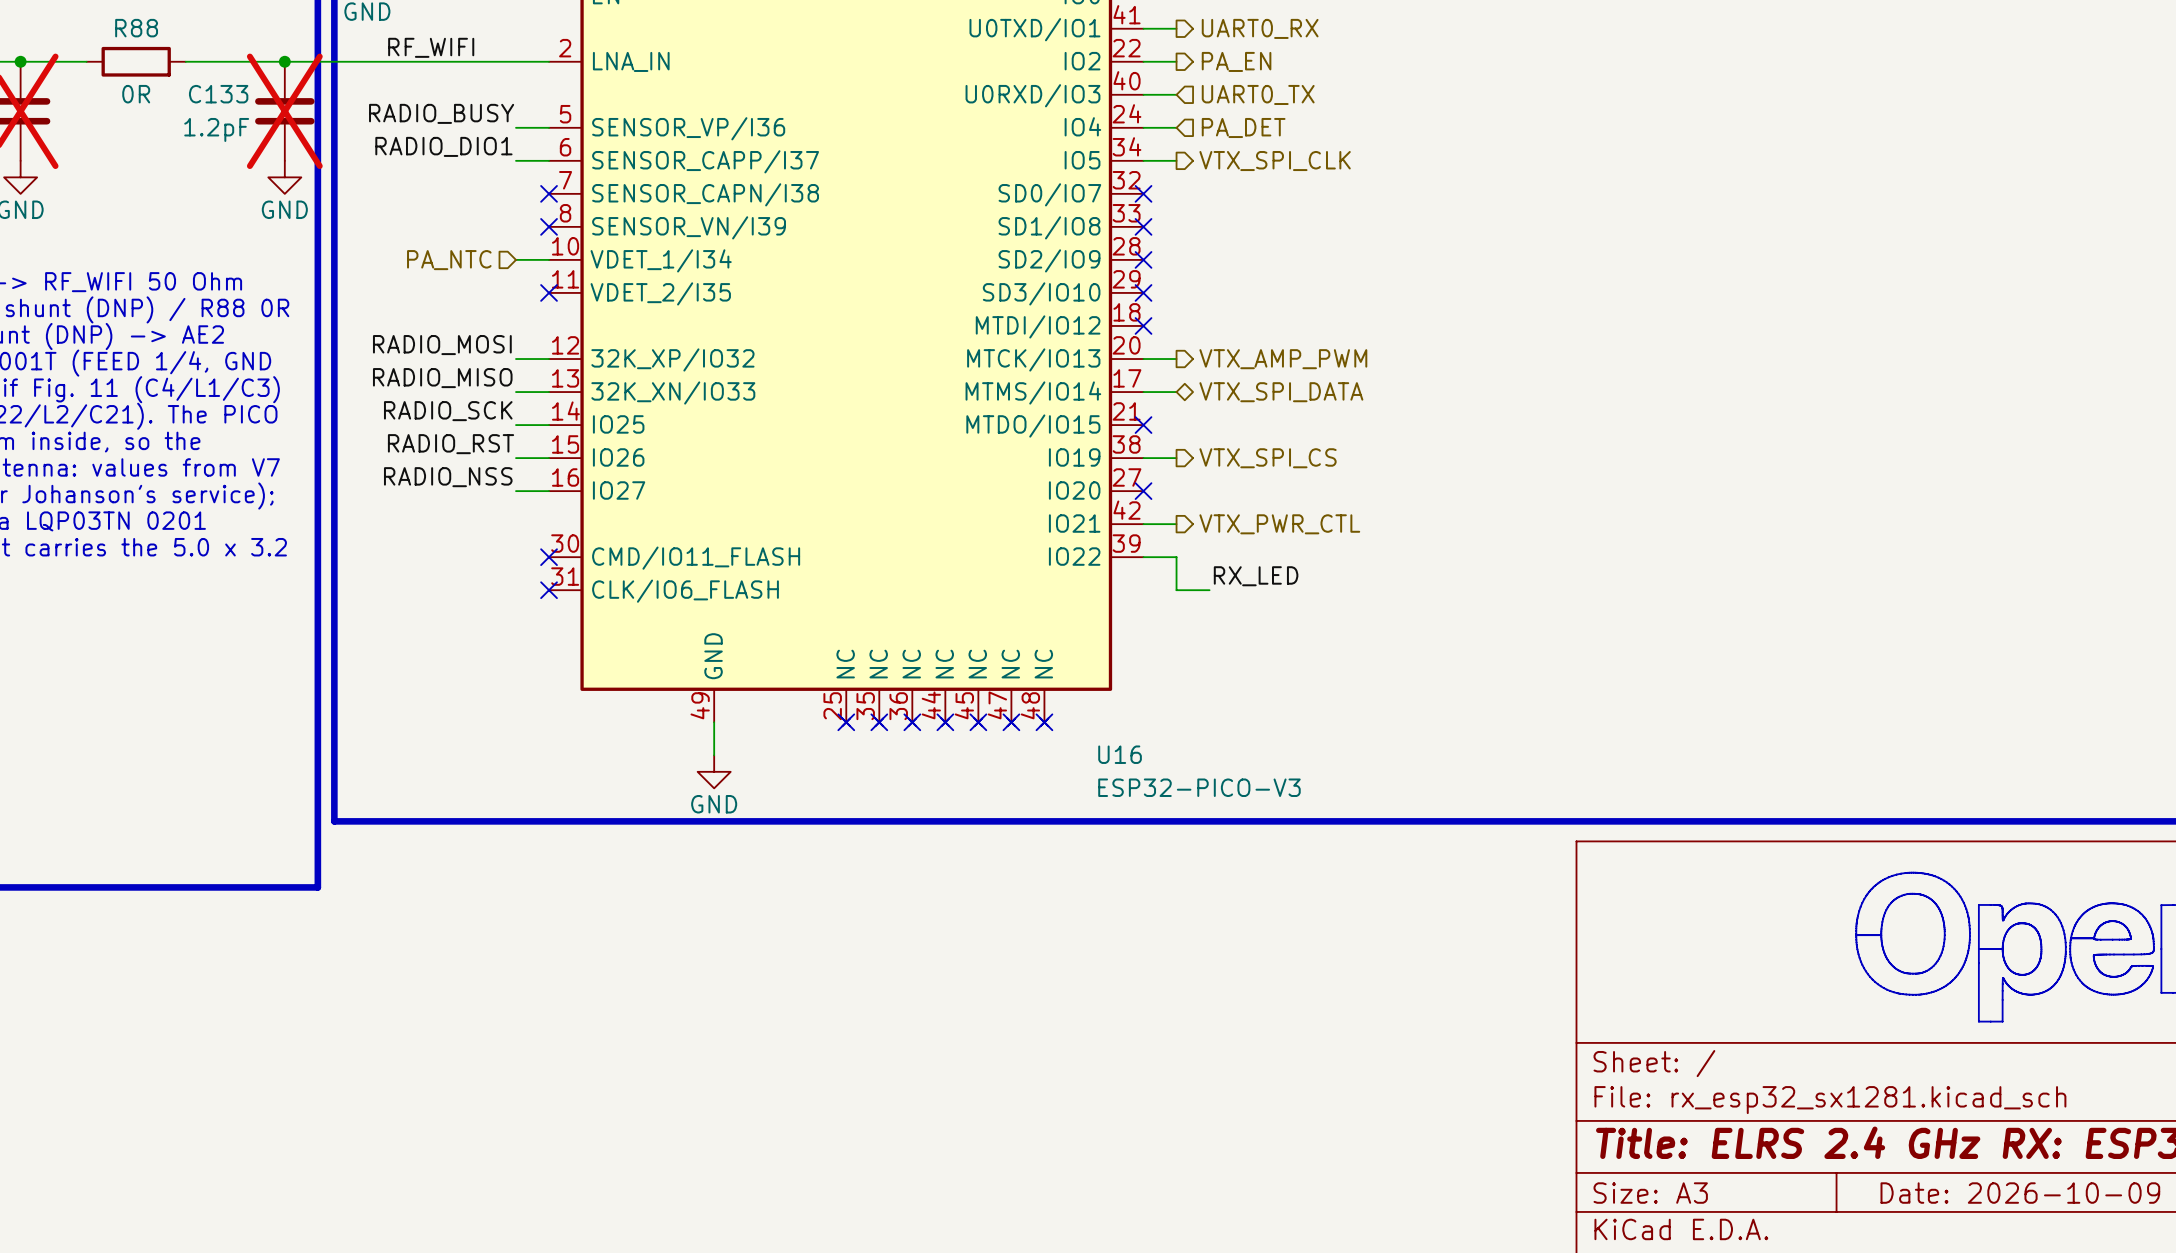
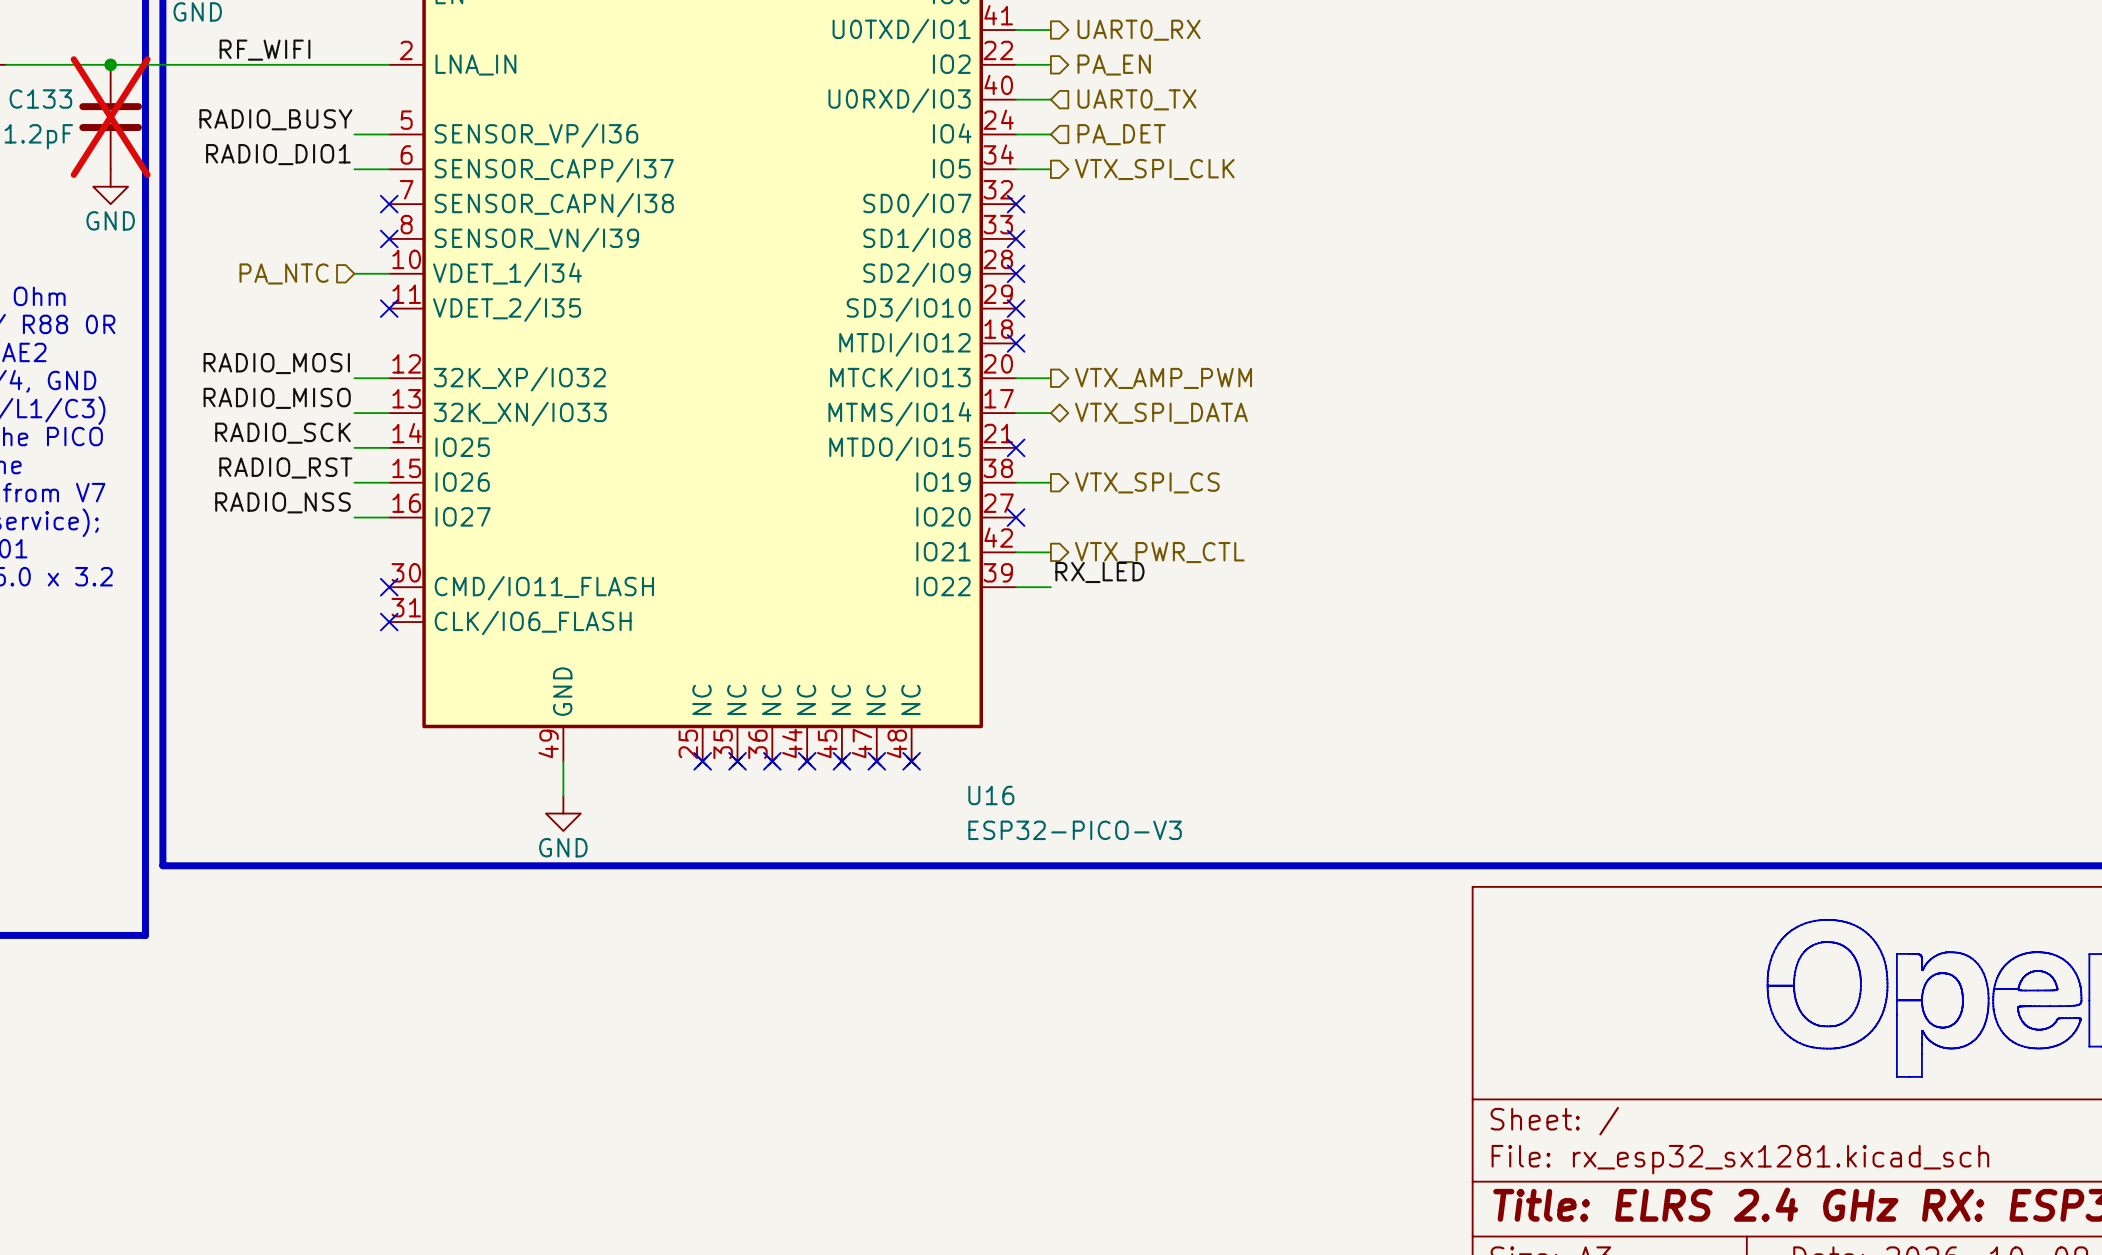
wire: (1176, 557) (1176, 590) (1209, 590) -> none
label position: RX_LED (1256, 576) -> RX_LED (1099, 572)

